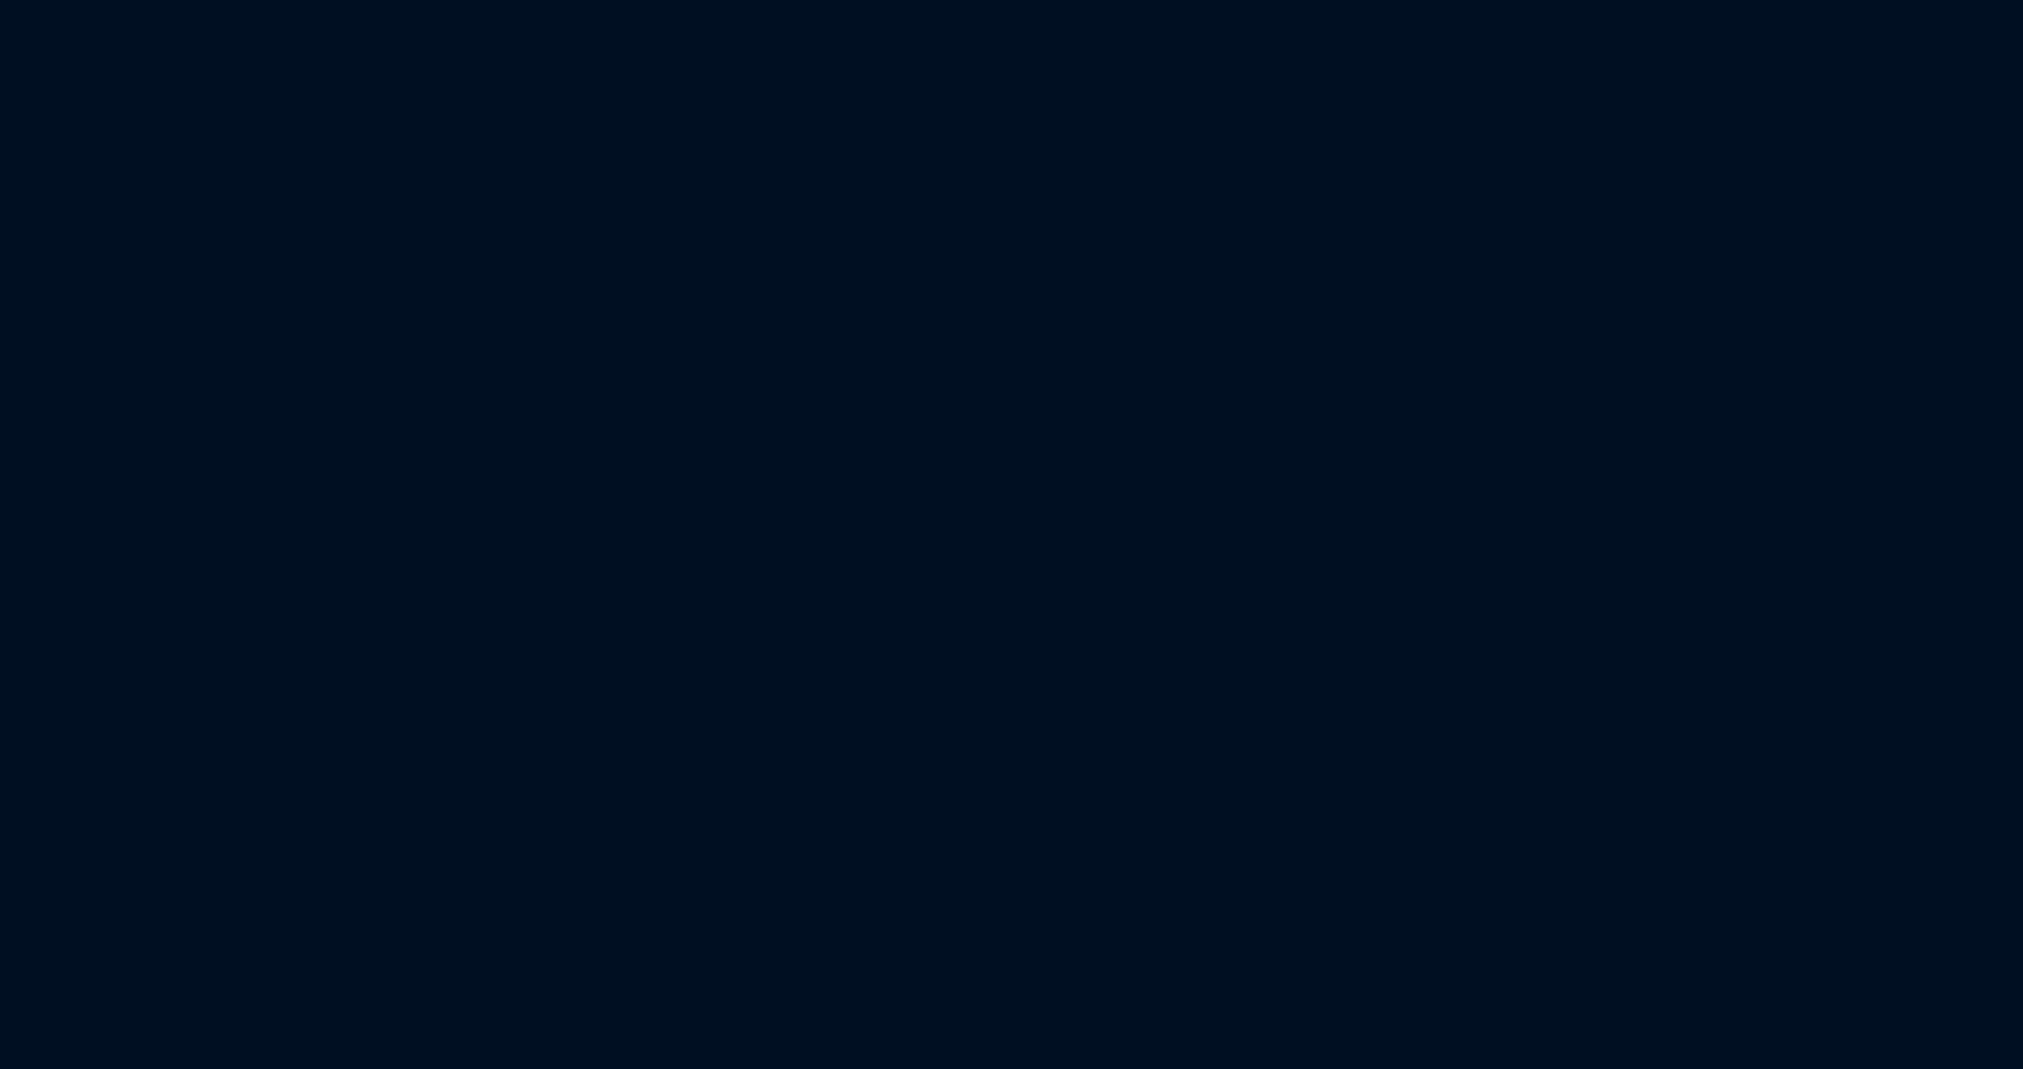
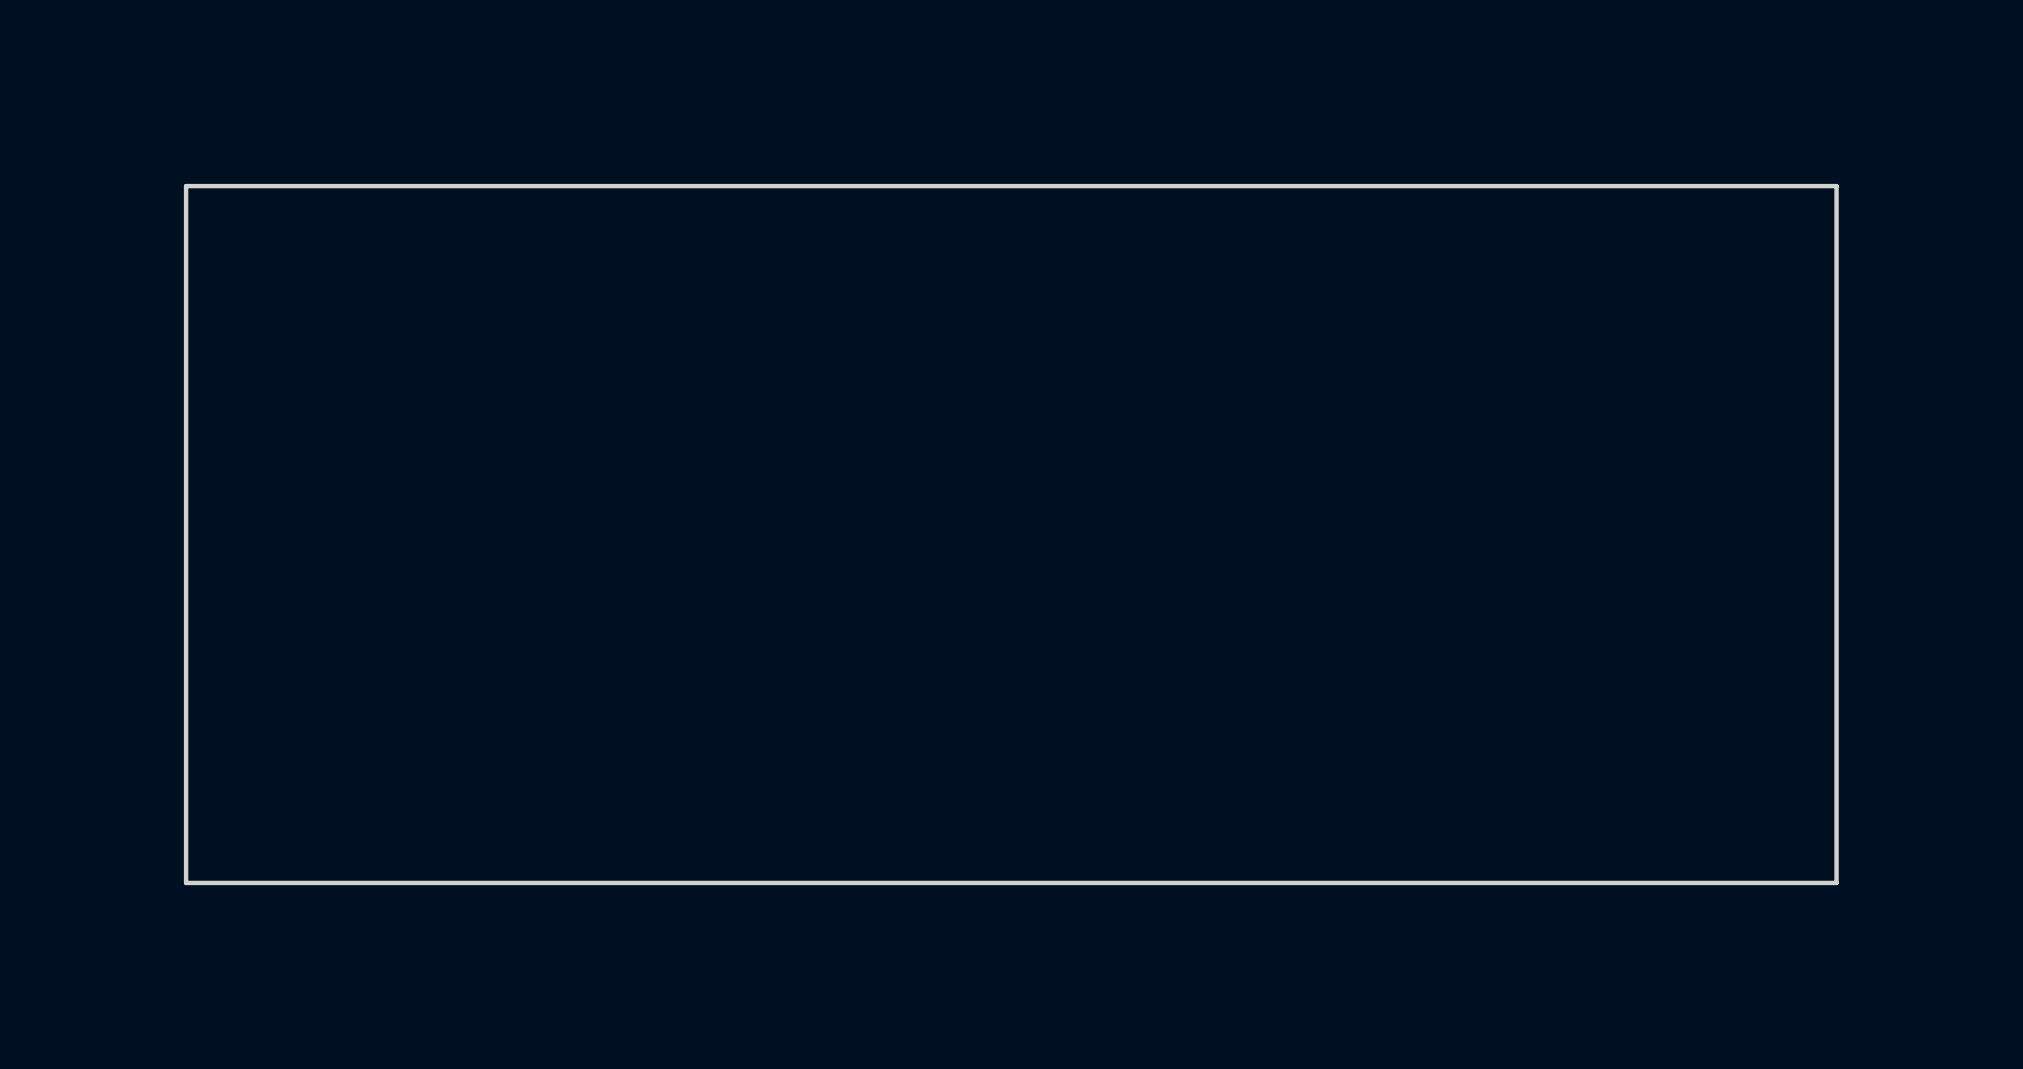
board edge: none -> (1836, 186) (1836, 882) (186, 882) (186, 186) (1836, 186)

